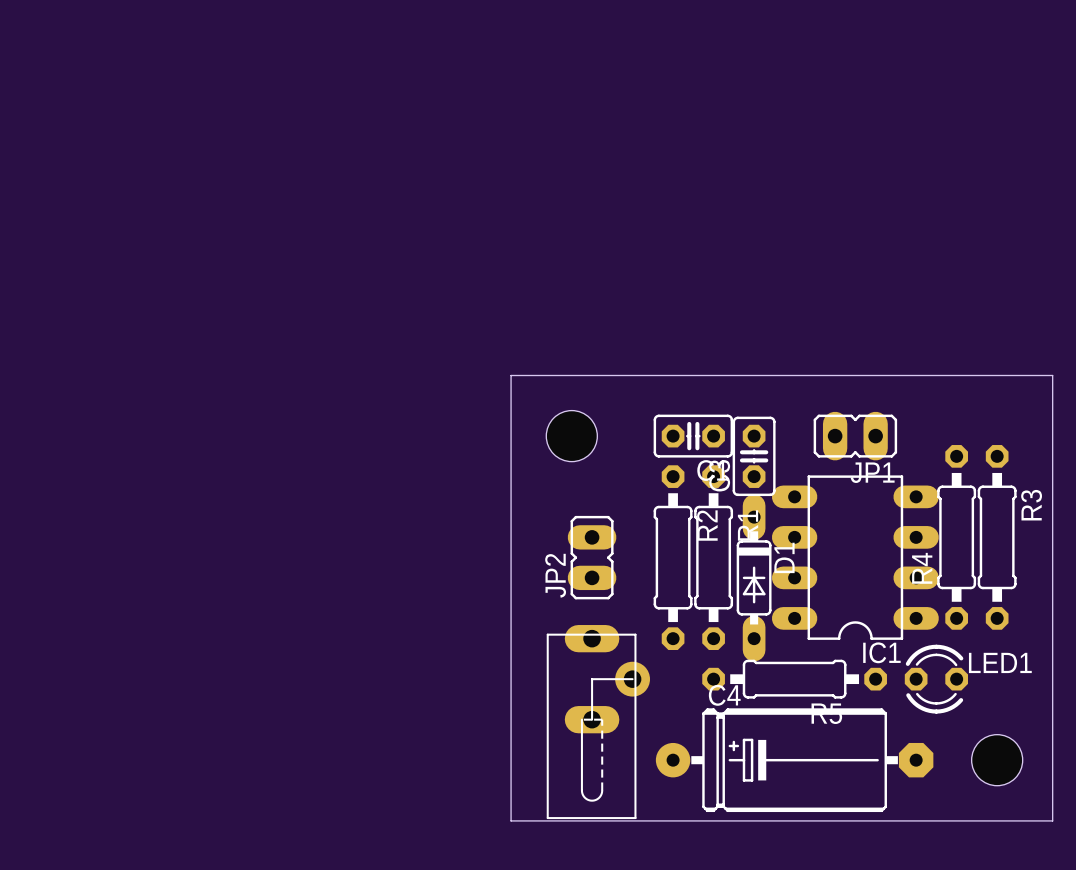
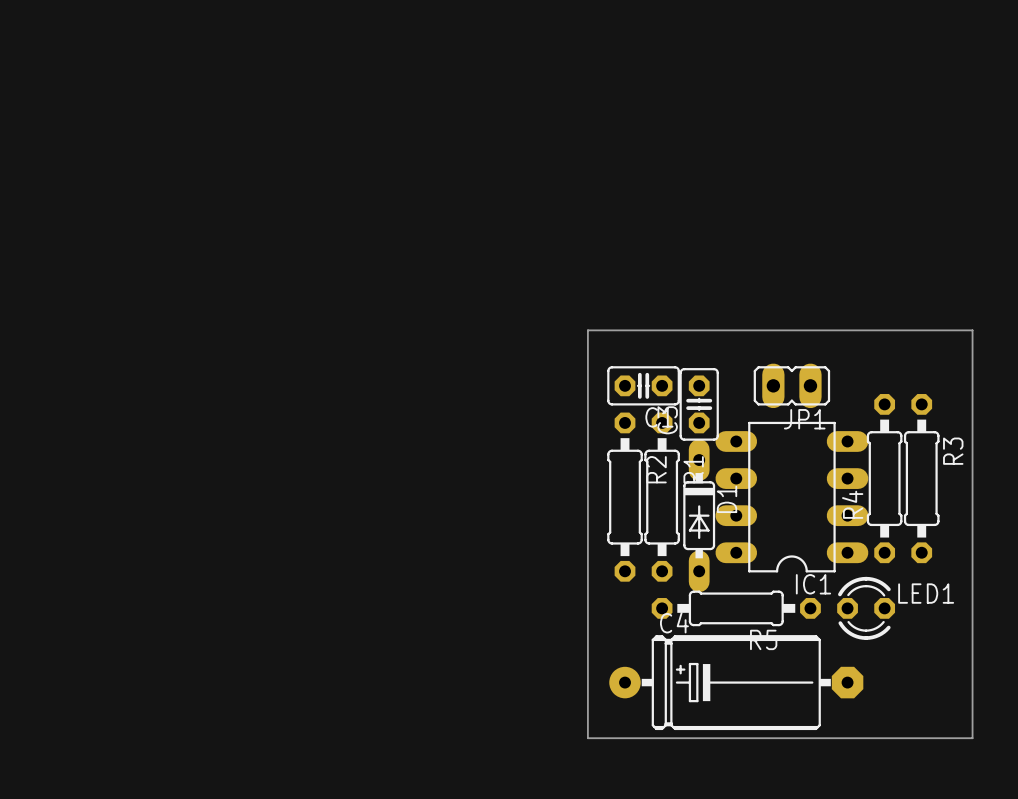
board edge: (632, 375) (511, 375) (511, 820) (632, 820) -> (587, 330) (587, 738)
hole: (571, 436) -> none
JP2: (592, 557) -> none
part: (598, 722) -> none
hole: (997, 760) -> none

